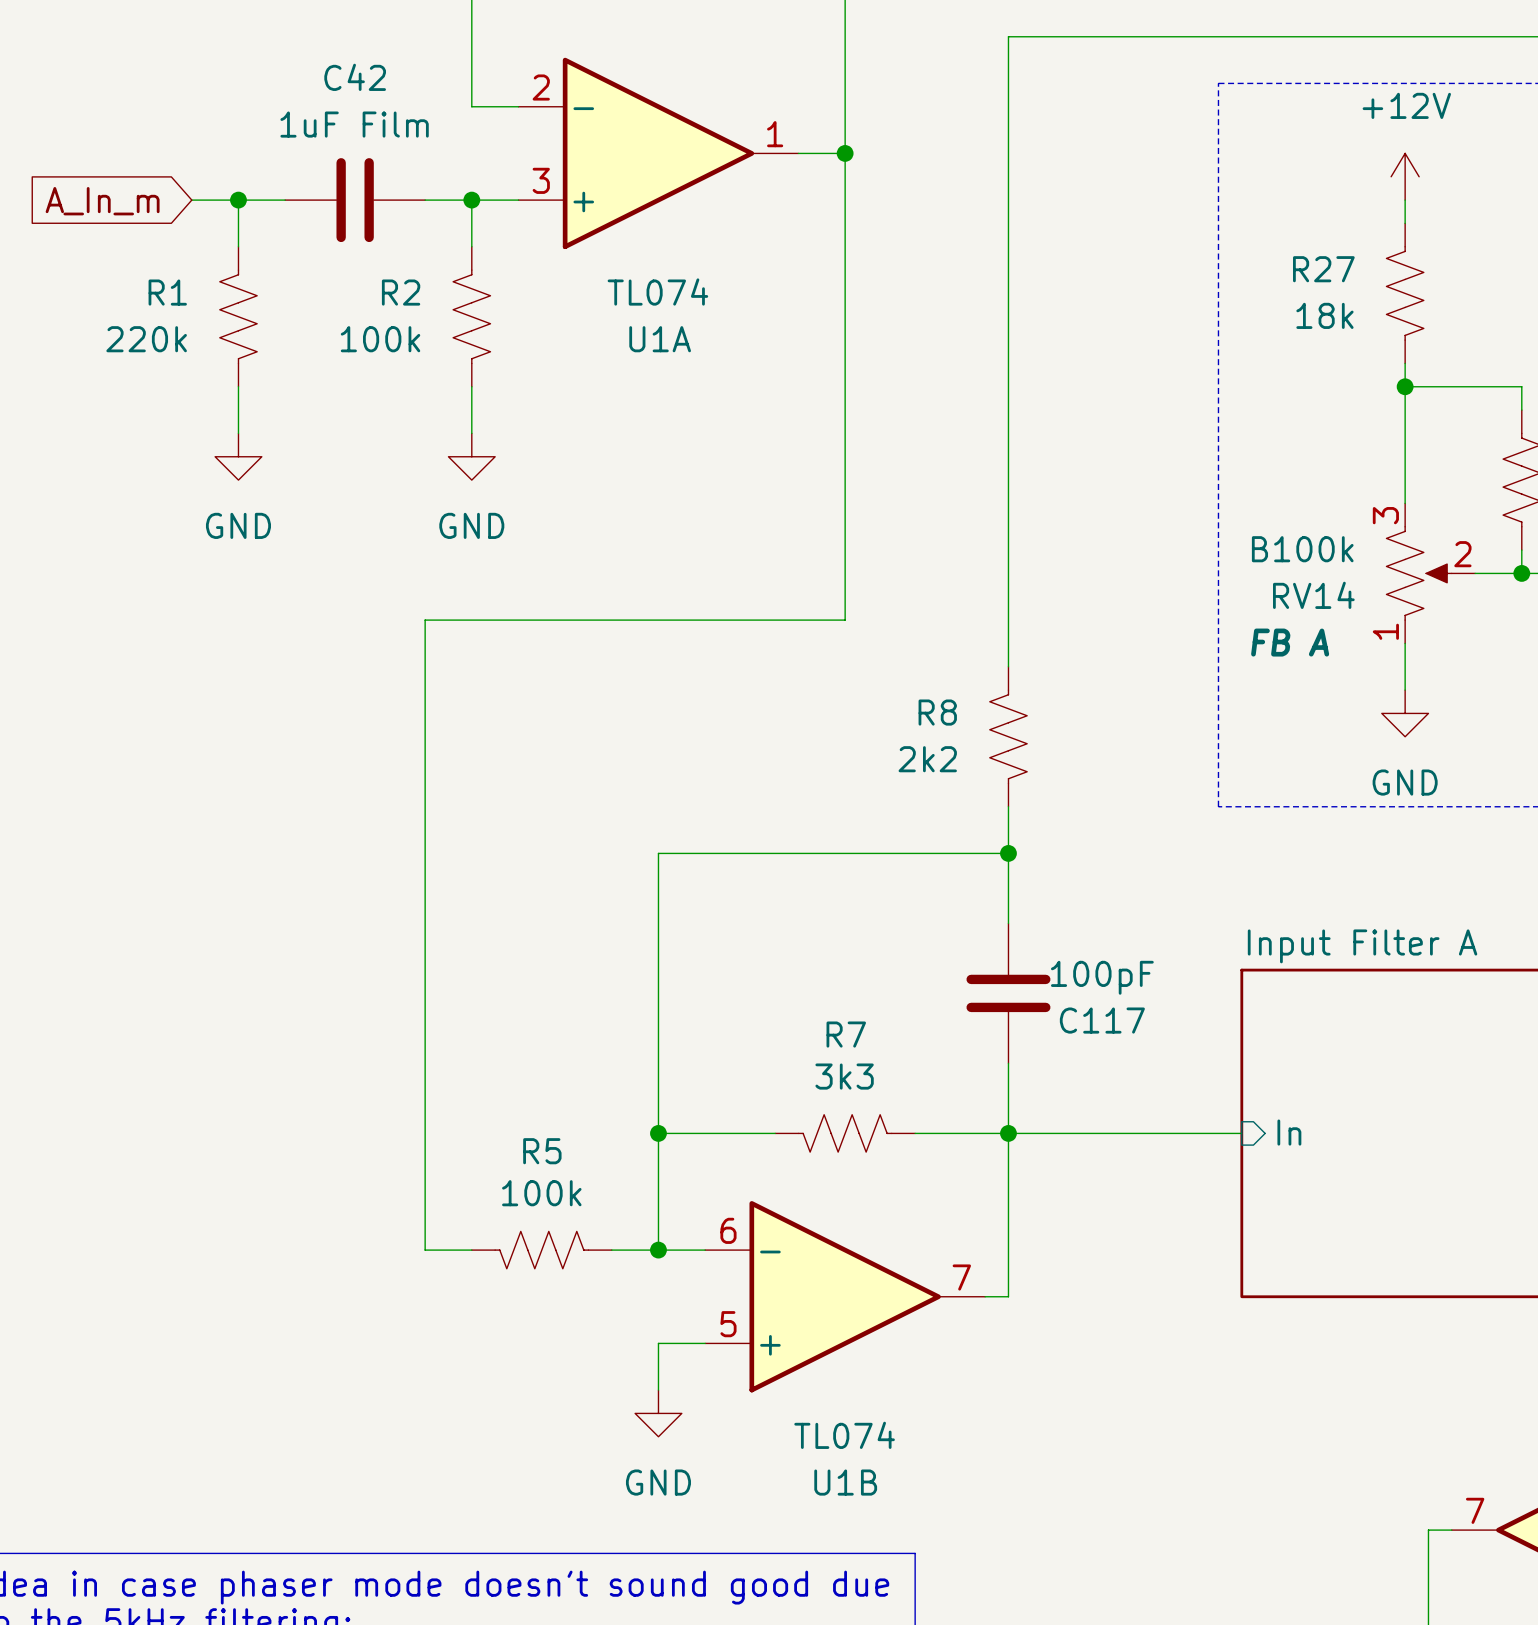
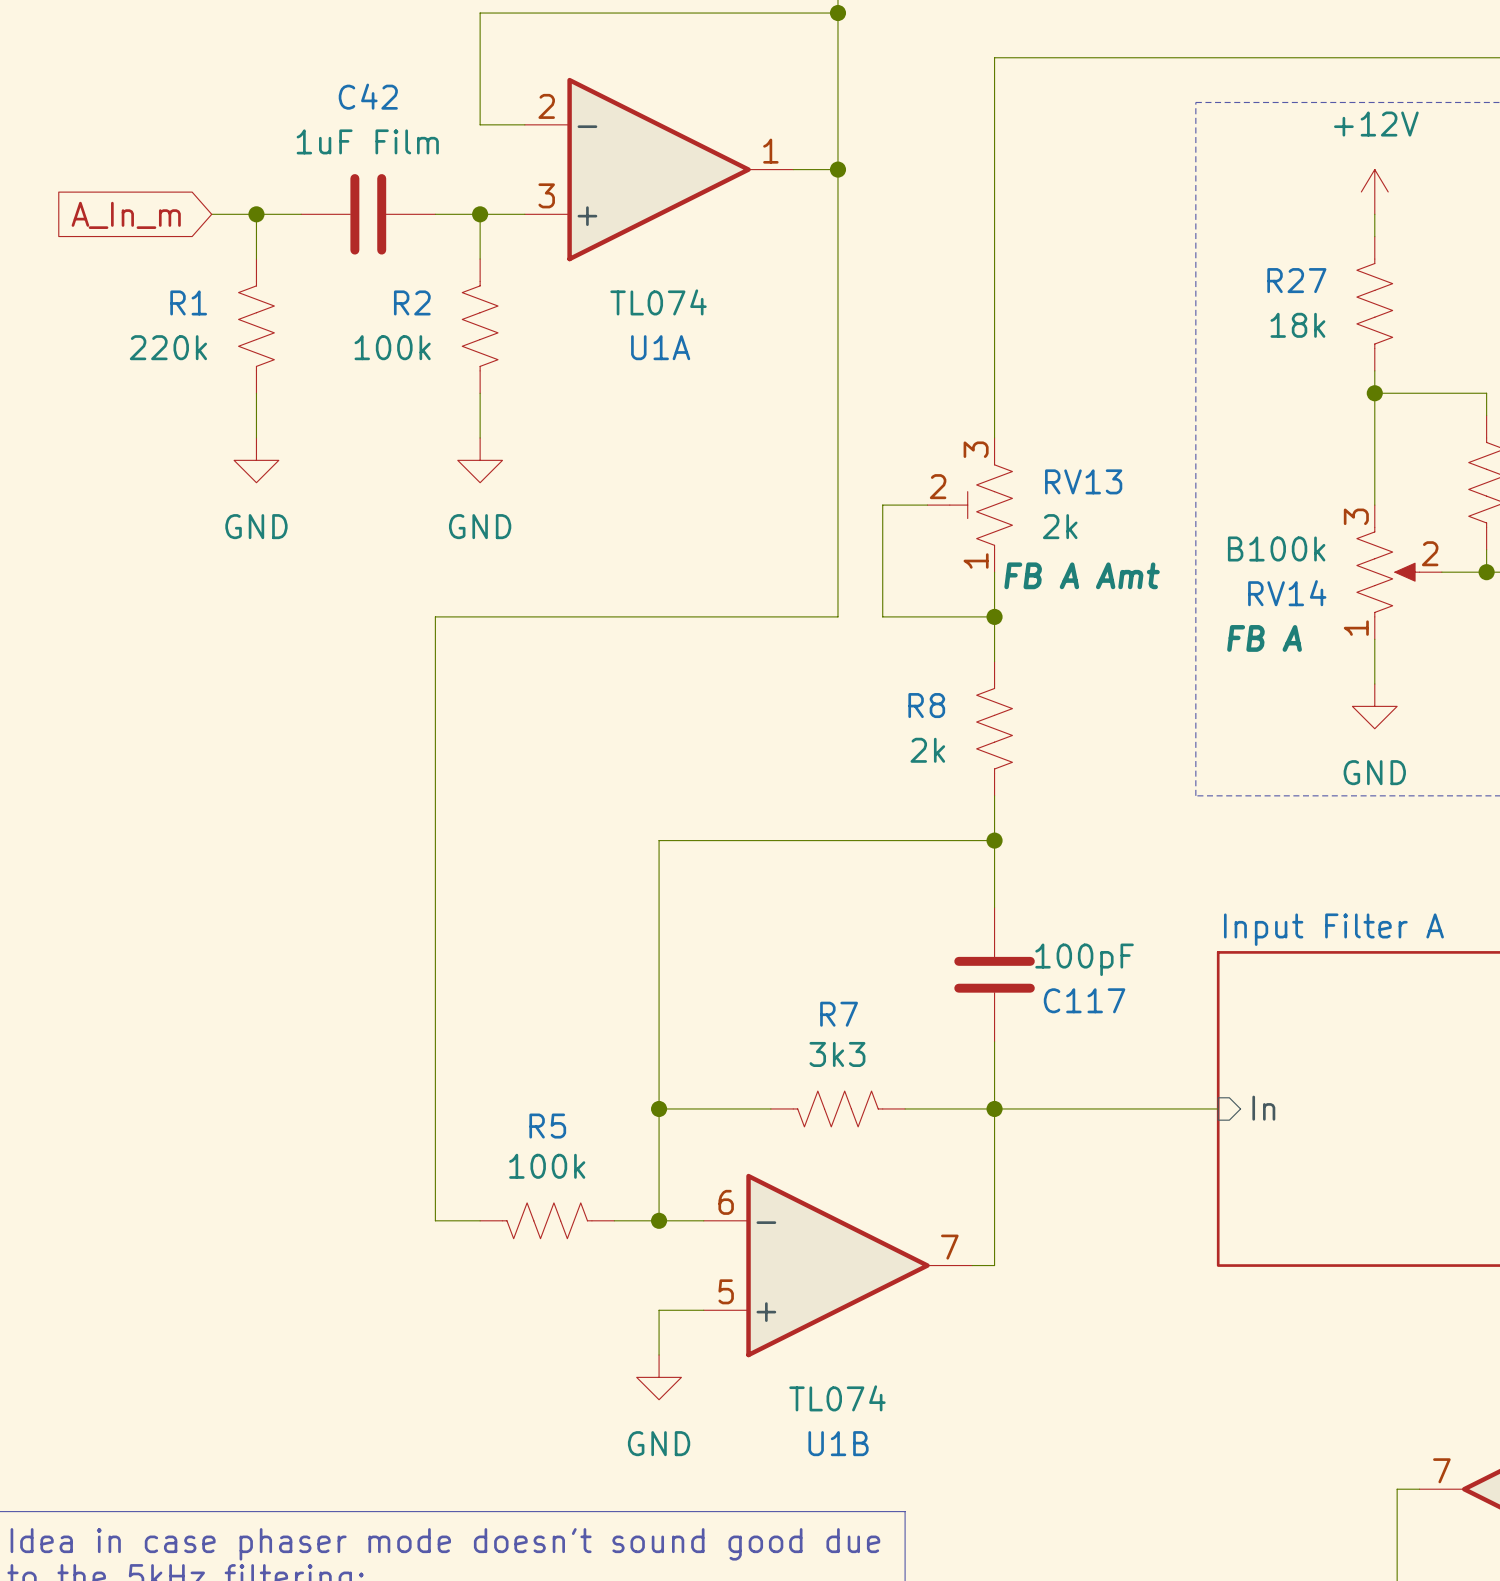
wire: (1008, 433) (1008, 573) -> none
wire: none -> (927, 505) (882, 505) (882, 616) (994, 616)
RV13: none -> 2k (969, 505)
junction: none -> (994, 616)
R8 value: 2k2 (927, 759) -> 2k (927, 750)

